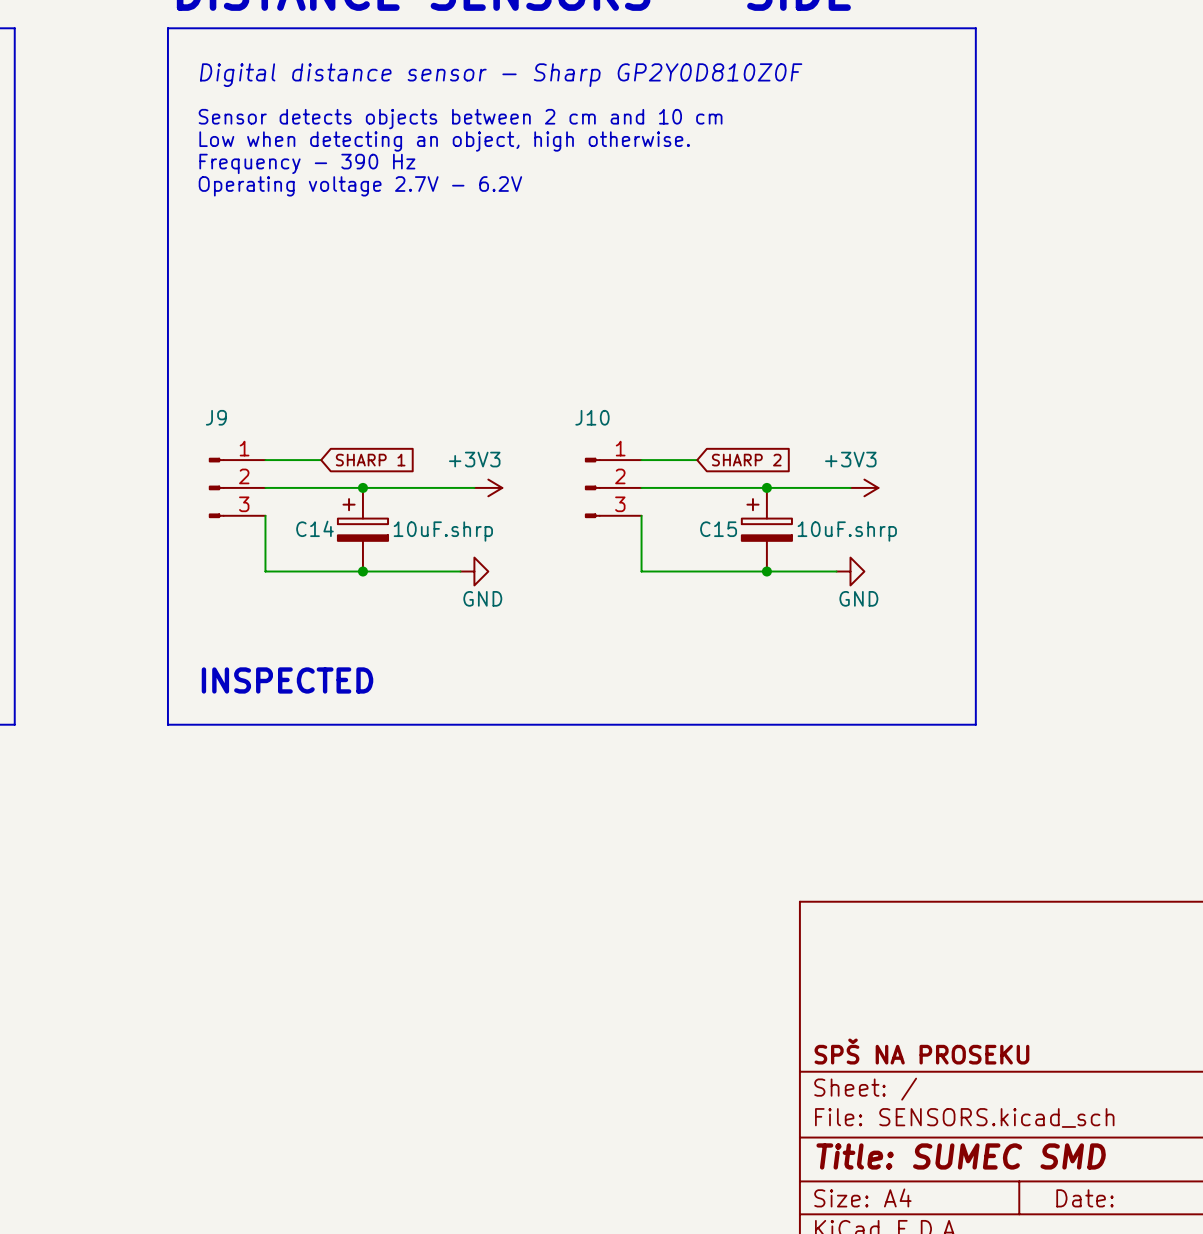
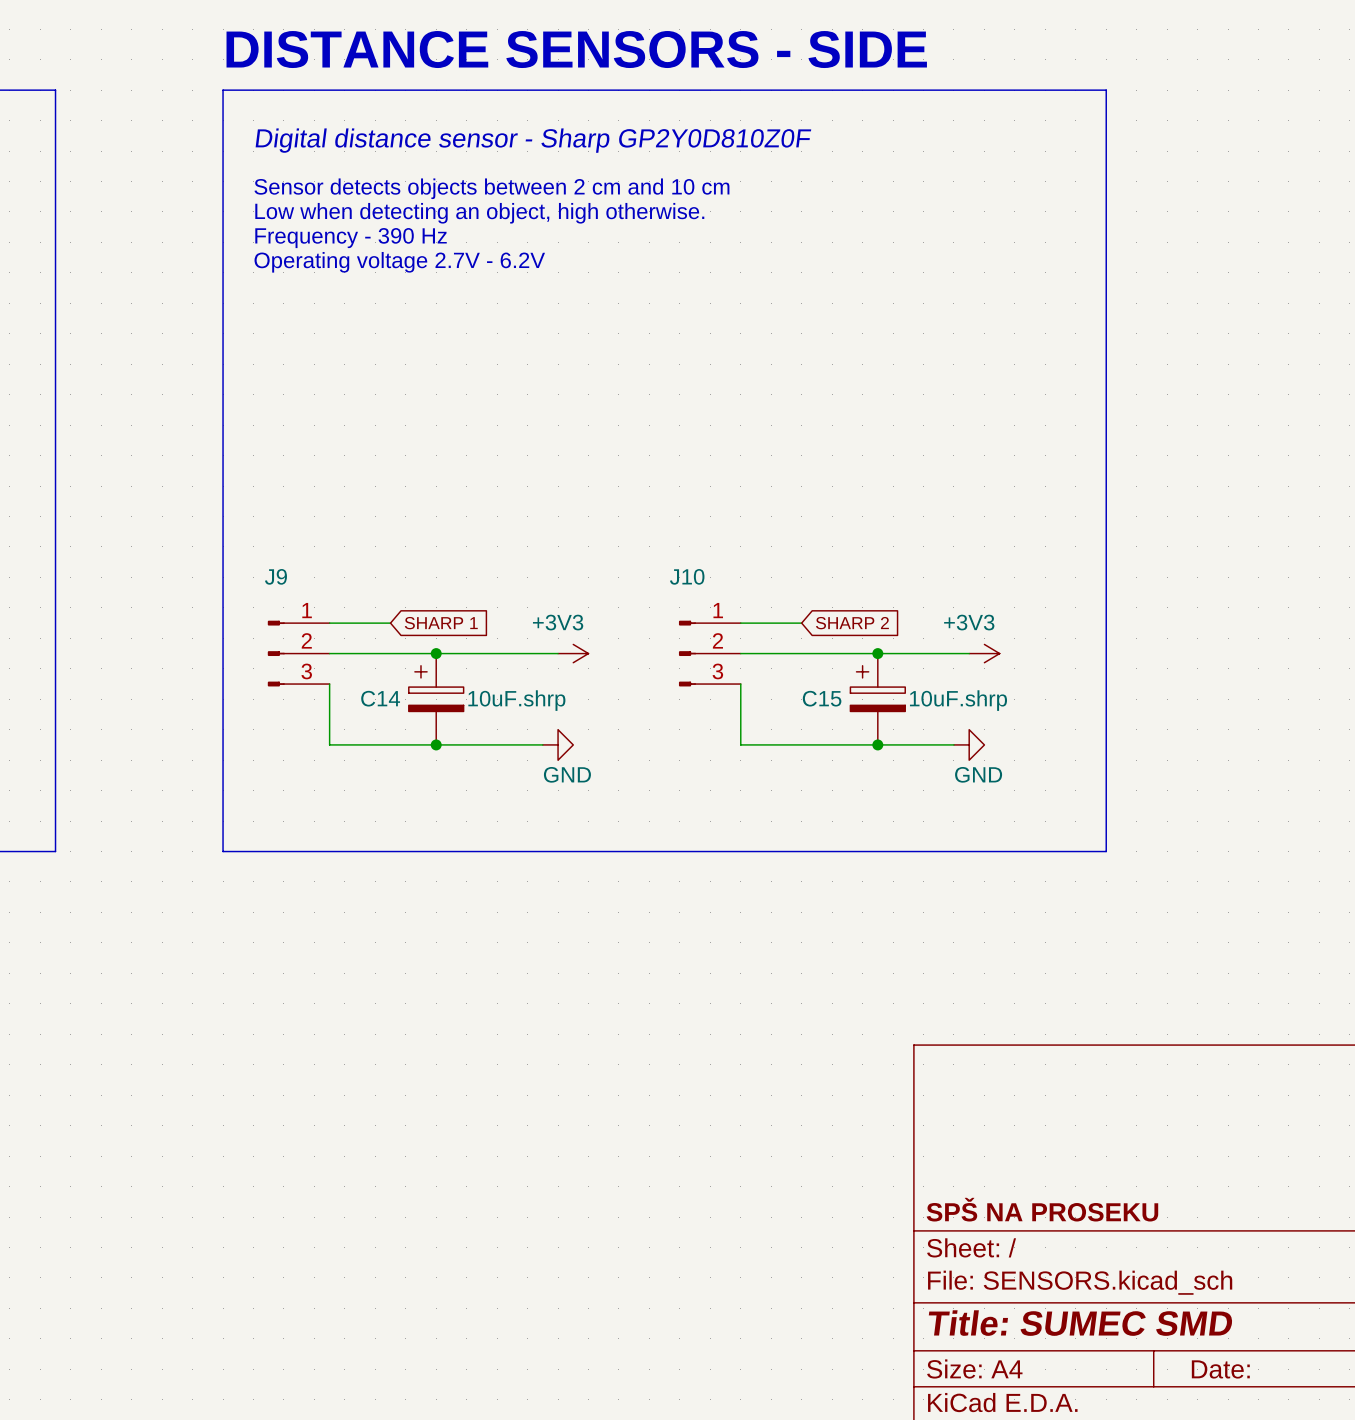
wire: (265, 460) (321, 460) -> none
global label position: SHARP 1 (370, 460) -> SHARP 1 (441, 623)
wire: (641, 460) (697, 460) -> none
global label position: SHARP 2 (746, 460) -> SHARP 2 (852, 623)
J9 position: (237, 487) -> (298, 653)
wire: (265, 487) (474, 487) -> (329, 653) (558, 653)
junction: (362, 487) -> none
power symbol position: +3V3 (488, 487) -> +3V3 (573, 653)
J10 position: (613, 487) -> (709, 653)
wire: (641, 487) (850, 487) -> (740, 653) (969, 653)
junction: (766, 487) -> none
power symbol position: +3V3 (864, 487) -> +3V3 (984, 653)
wire: (265, 515) (265, 571) (460, 571) -> (329, 623) (390, 623)
wire: (641, 515) (641, 571) (836, 571) -> (740, 623) (801, 623)
C14 position: (362, 529) -> (436, 699)
C15 position: (766, 529) -> (877, 699)
junction: none -> (436, 653)
junction: none -> (877, 653)
wire: none -> (329, 684) (329, 744) (542, 744)
junction: (362, 571) -> none
power symbol position: GND (474, 571) -> GND (558, 744)
wire: none -> (740, 684) (740, 744) (953, 744)
junction: (766, 571) -> none
power symbol position: GND (850, 571) -> GND (969, 744)
junction: none -> (436, 744)
junction: none -> (877, 744)
text: INSPECTED (287, 680) -> none

